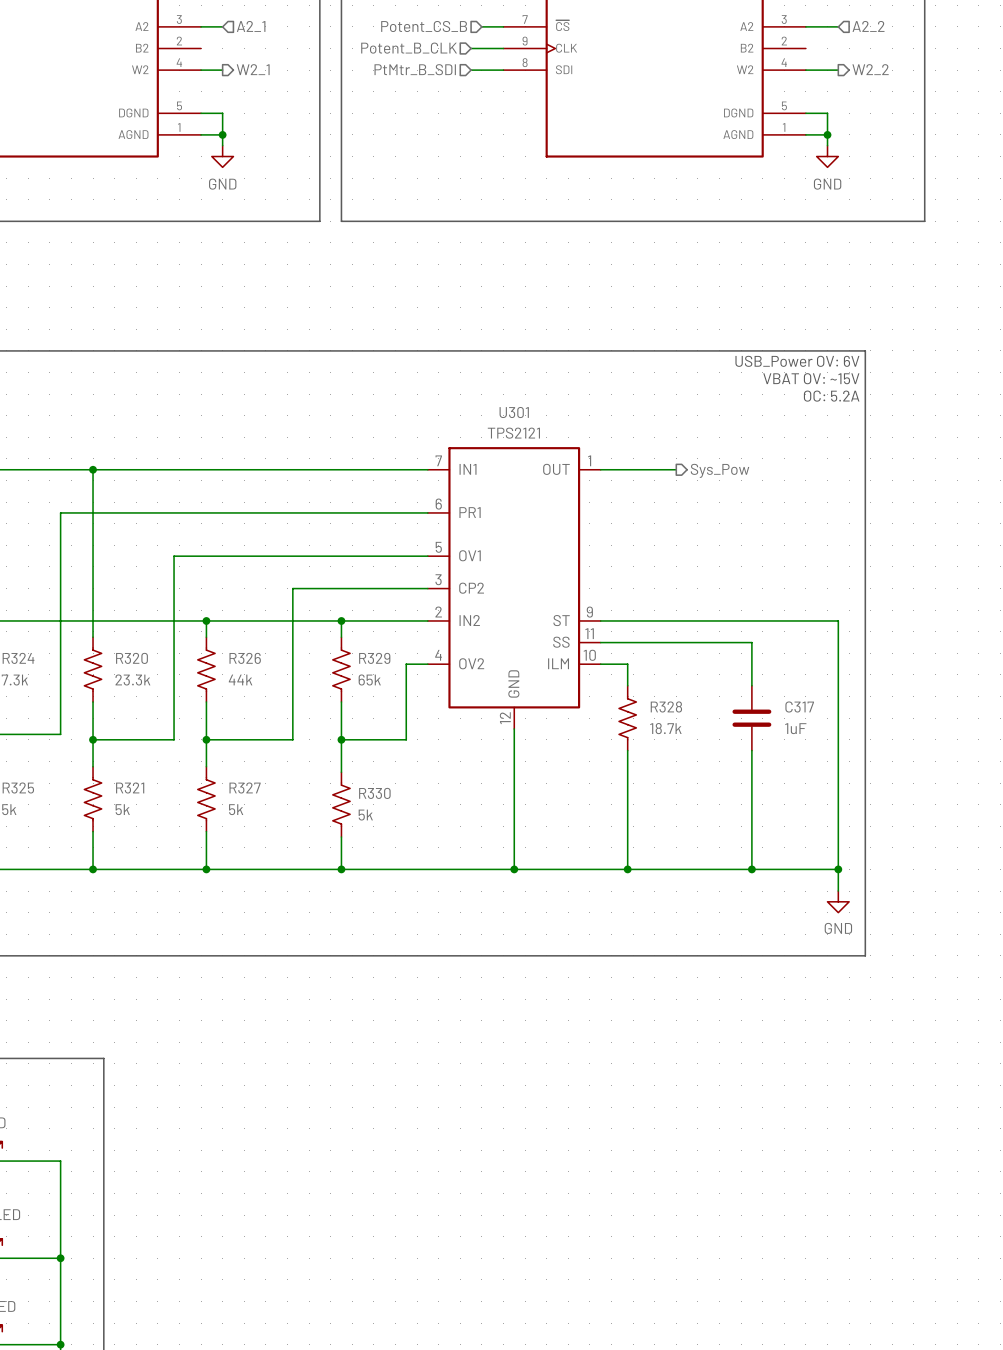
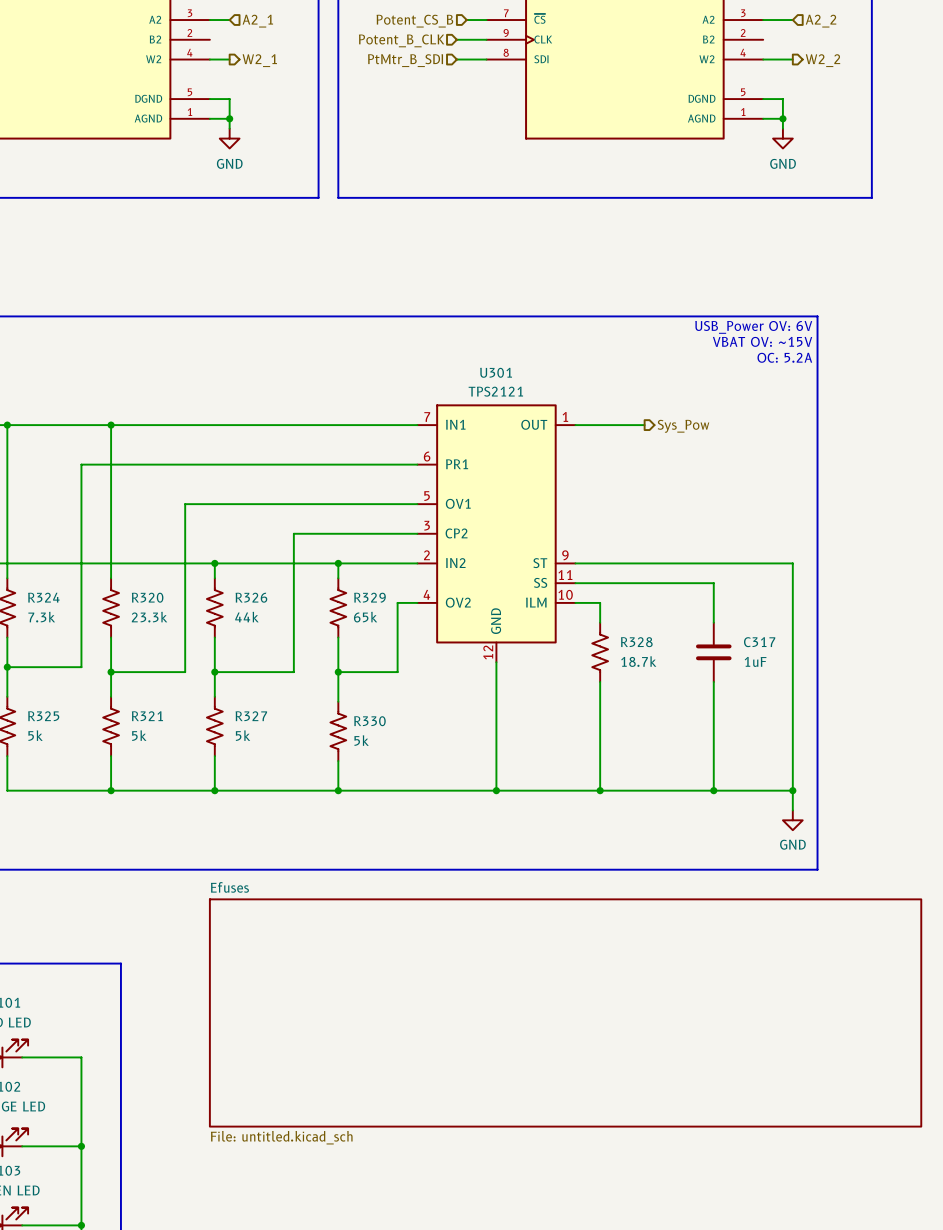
sheet Efuses: none -> File: untitled.kicad_sch (565, 1012)

